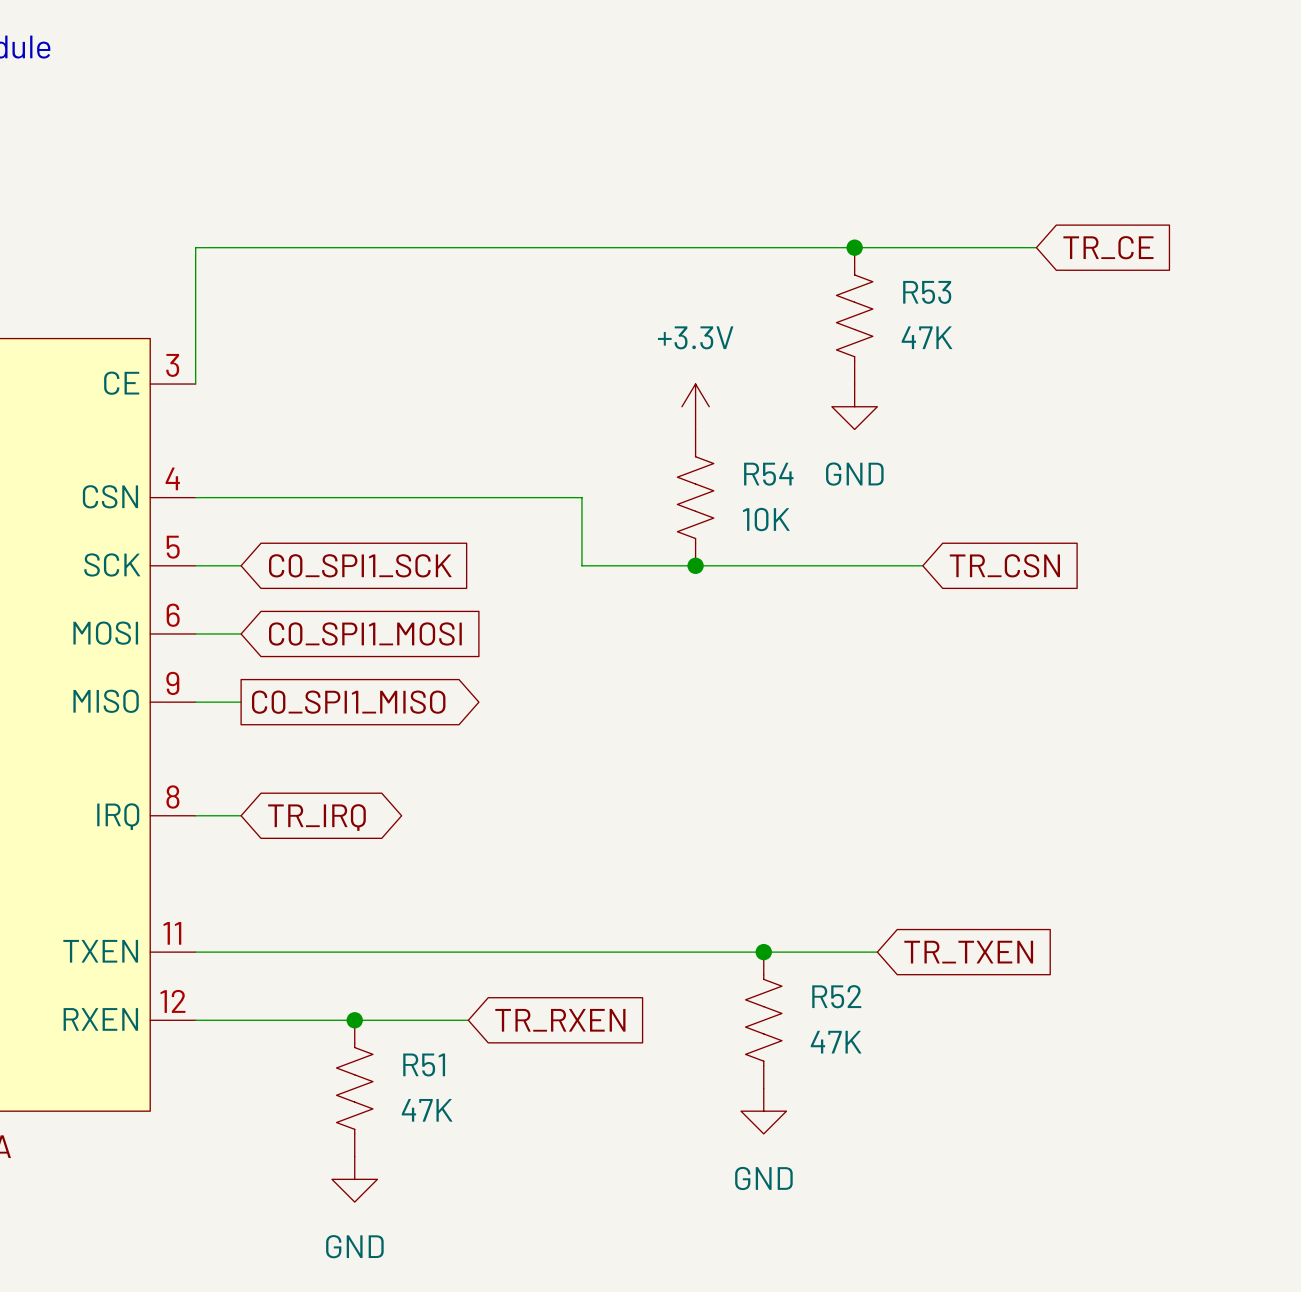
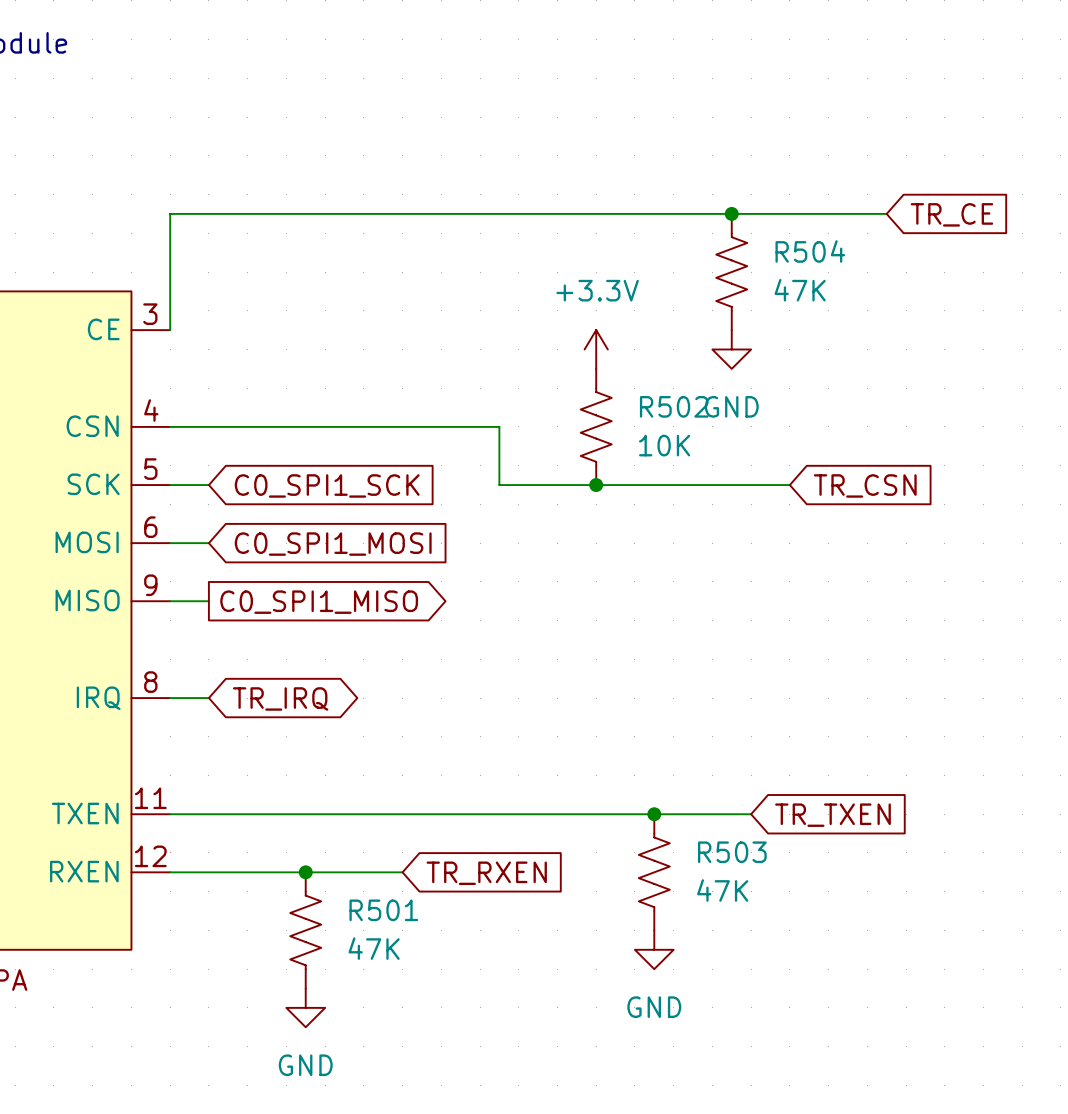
R53 name: R53 (927, 292) -> R504 (810, 251)
R54 name: R54 (768, 474) -> R502 (674, 406)
R52 name: R52 (836, 996) -> R503 (732, 852)
R51 name: R51 (424, 1064) -> R501 (383, 910)

